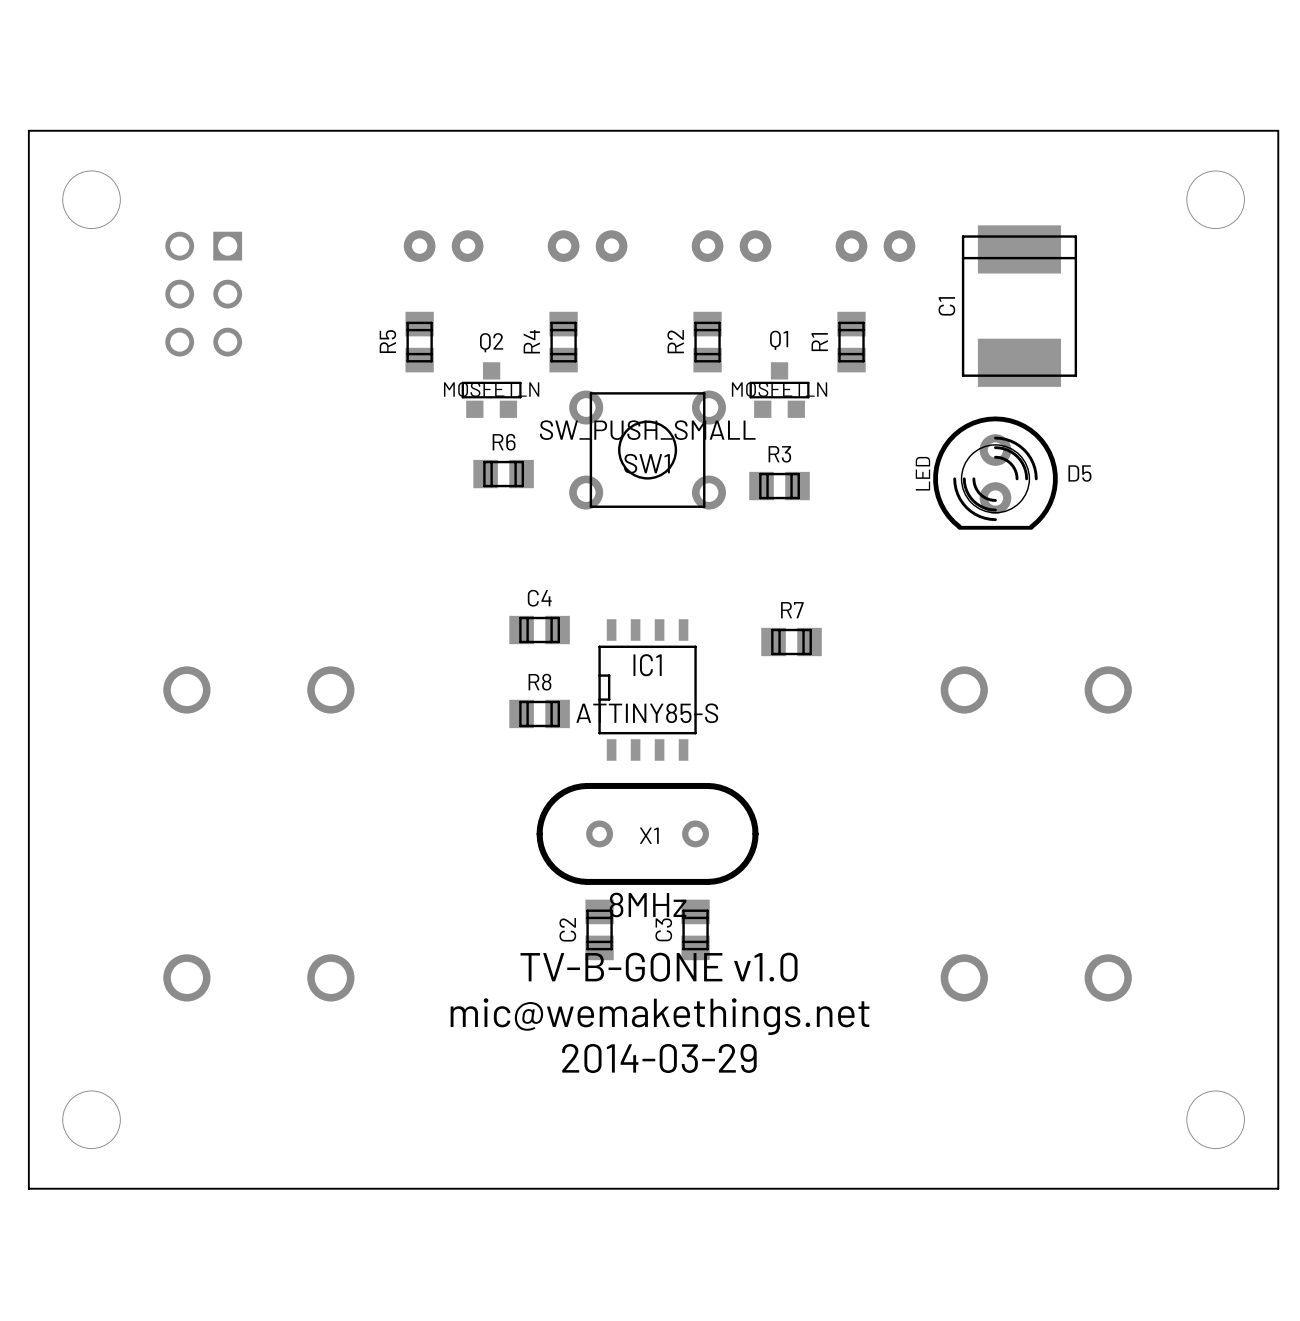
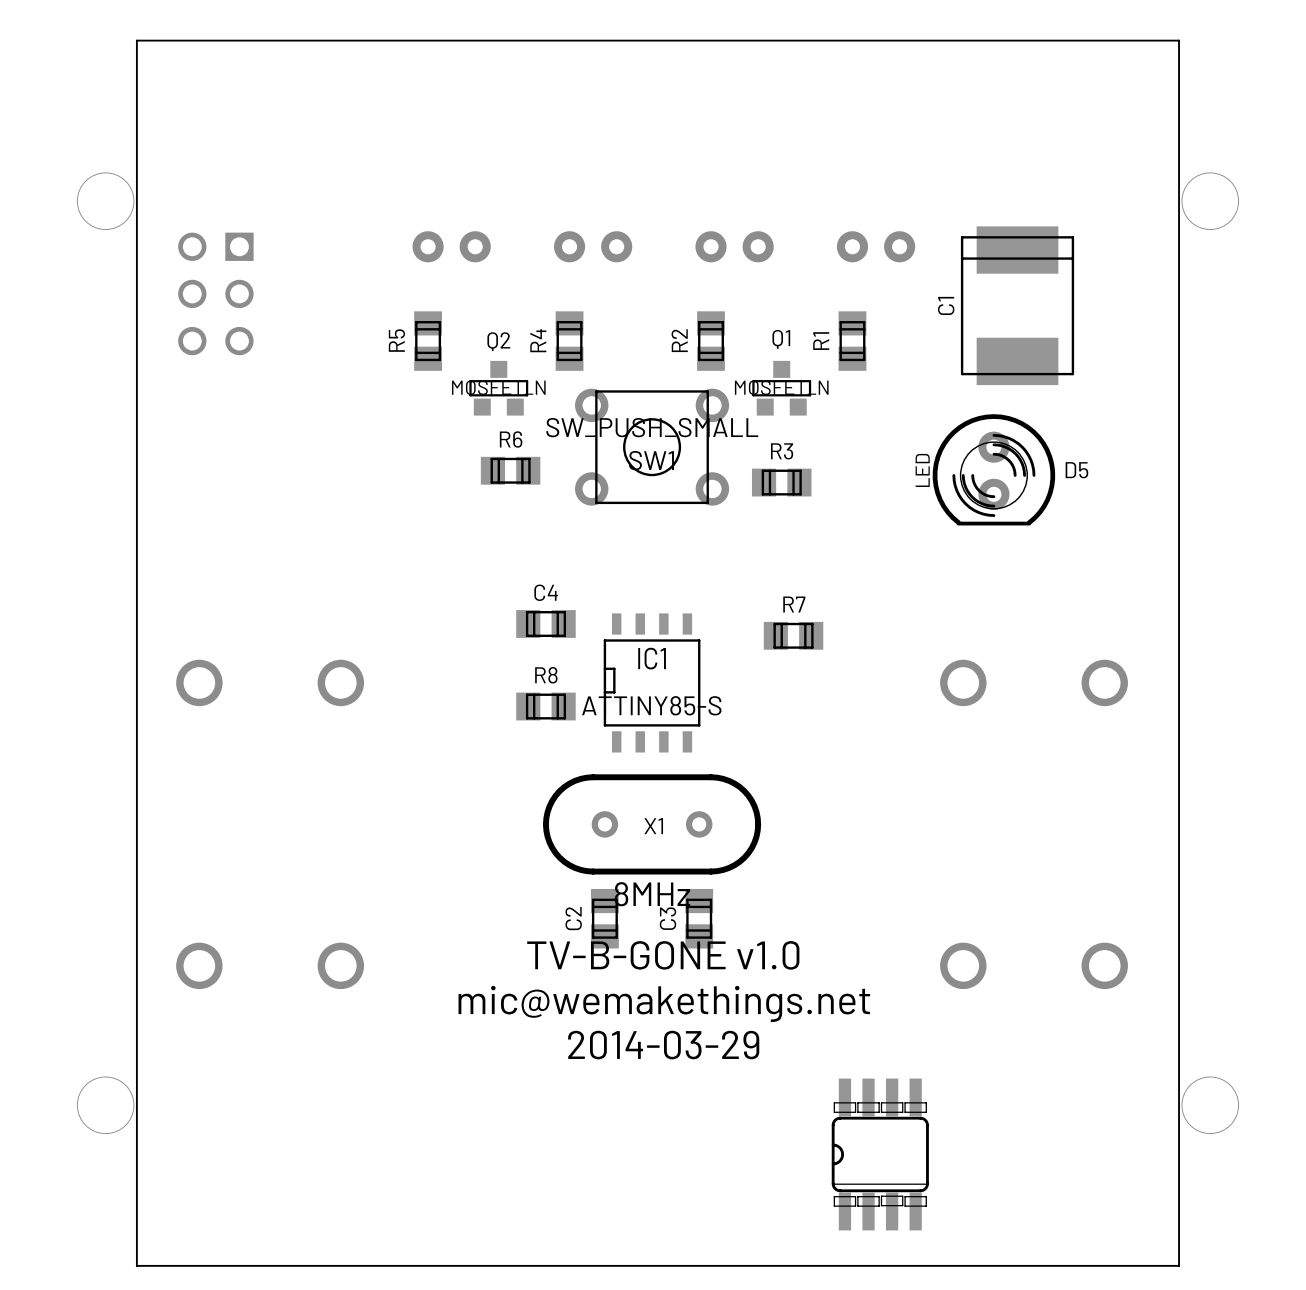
board edge: (28, 130) (28, 1188) (1278, 1188) (1278, 130) (28, 130) -> (136, 40) (136, 1265) (1179, 1265) (1179, 40) (136, 40)
part: none -> (880, 1154)

